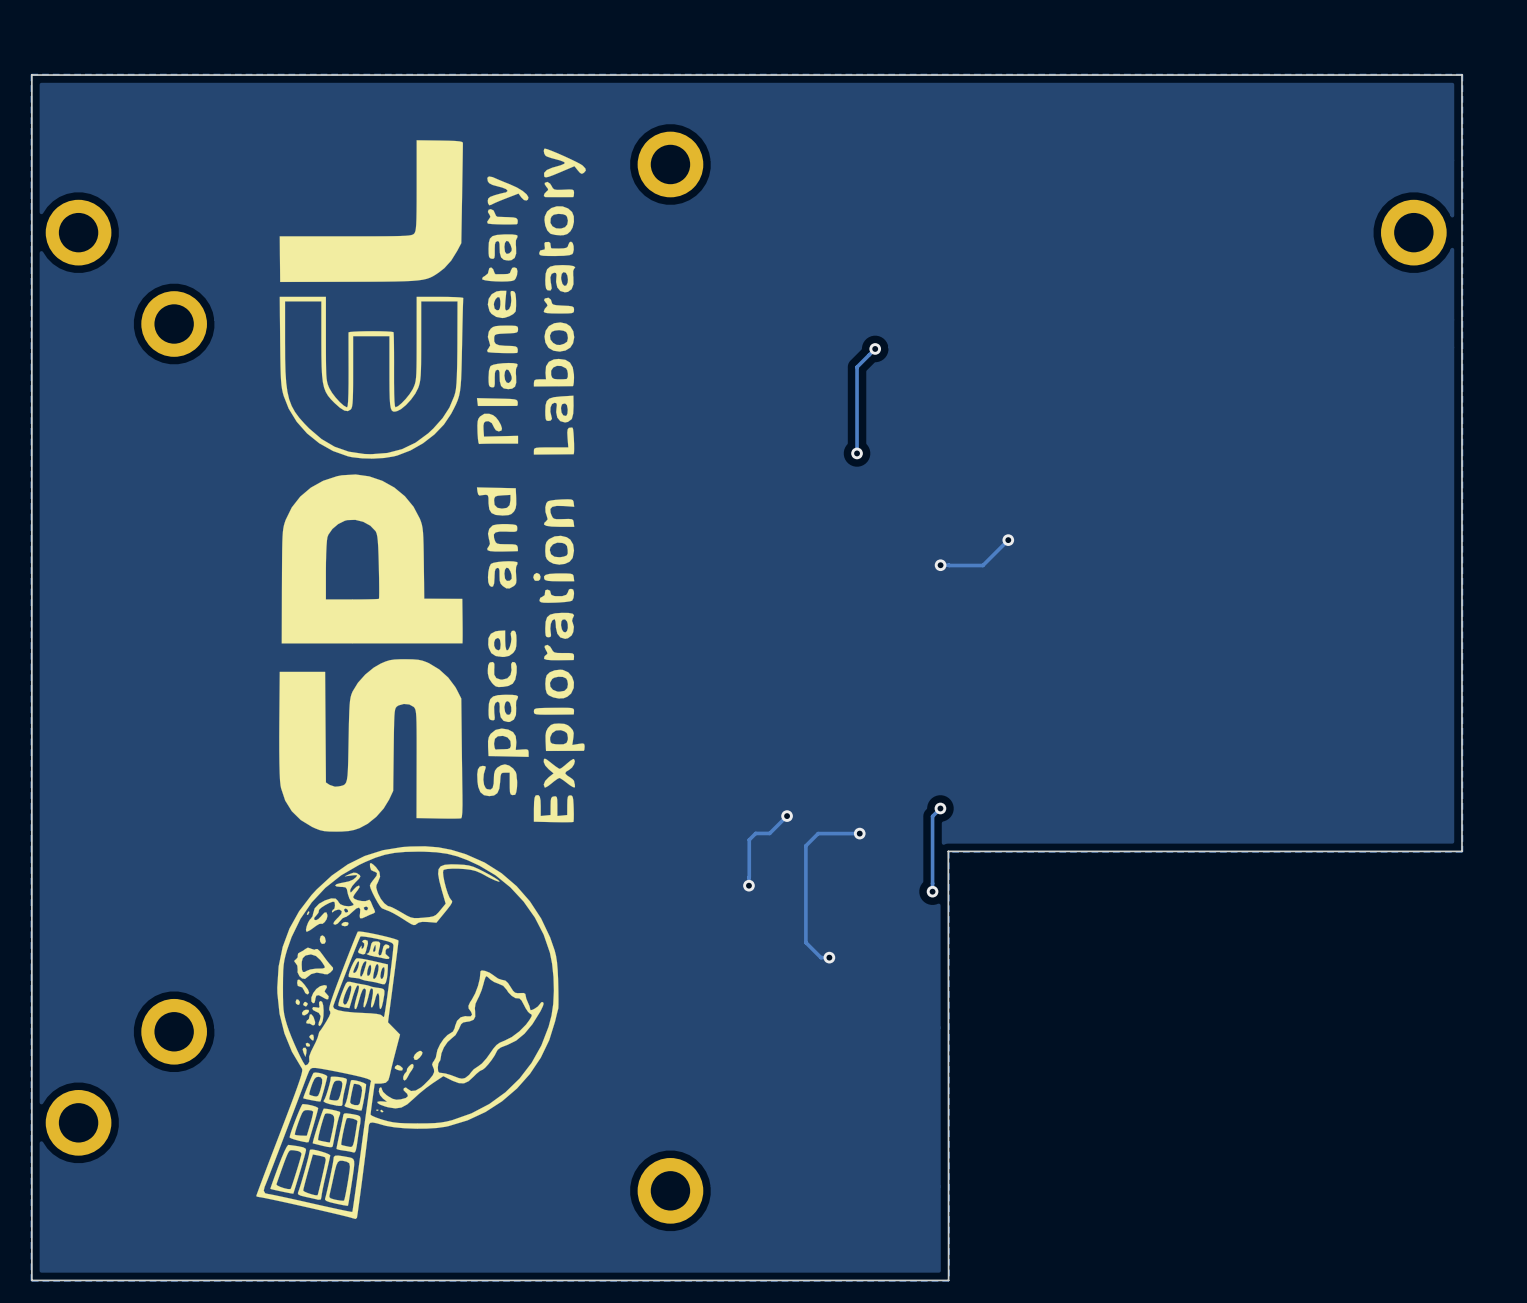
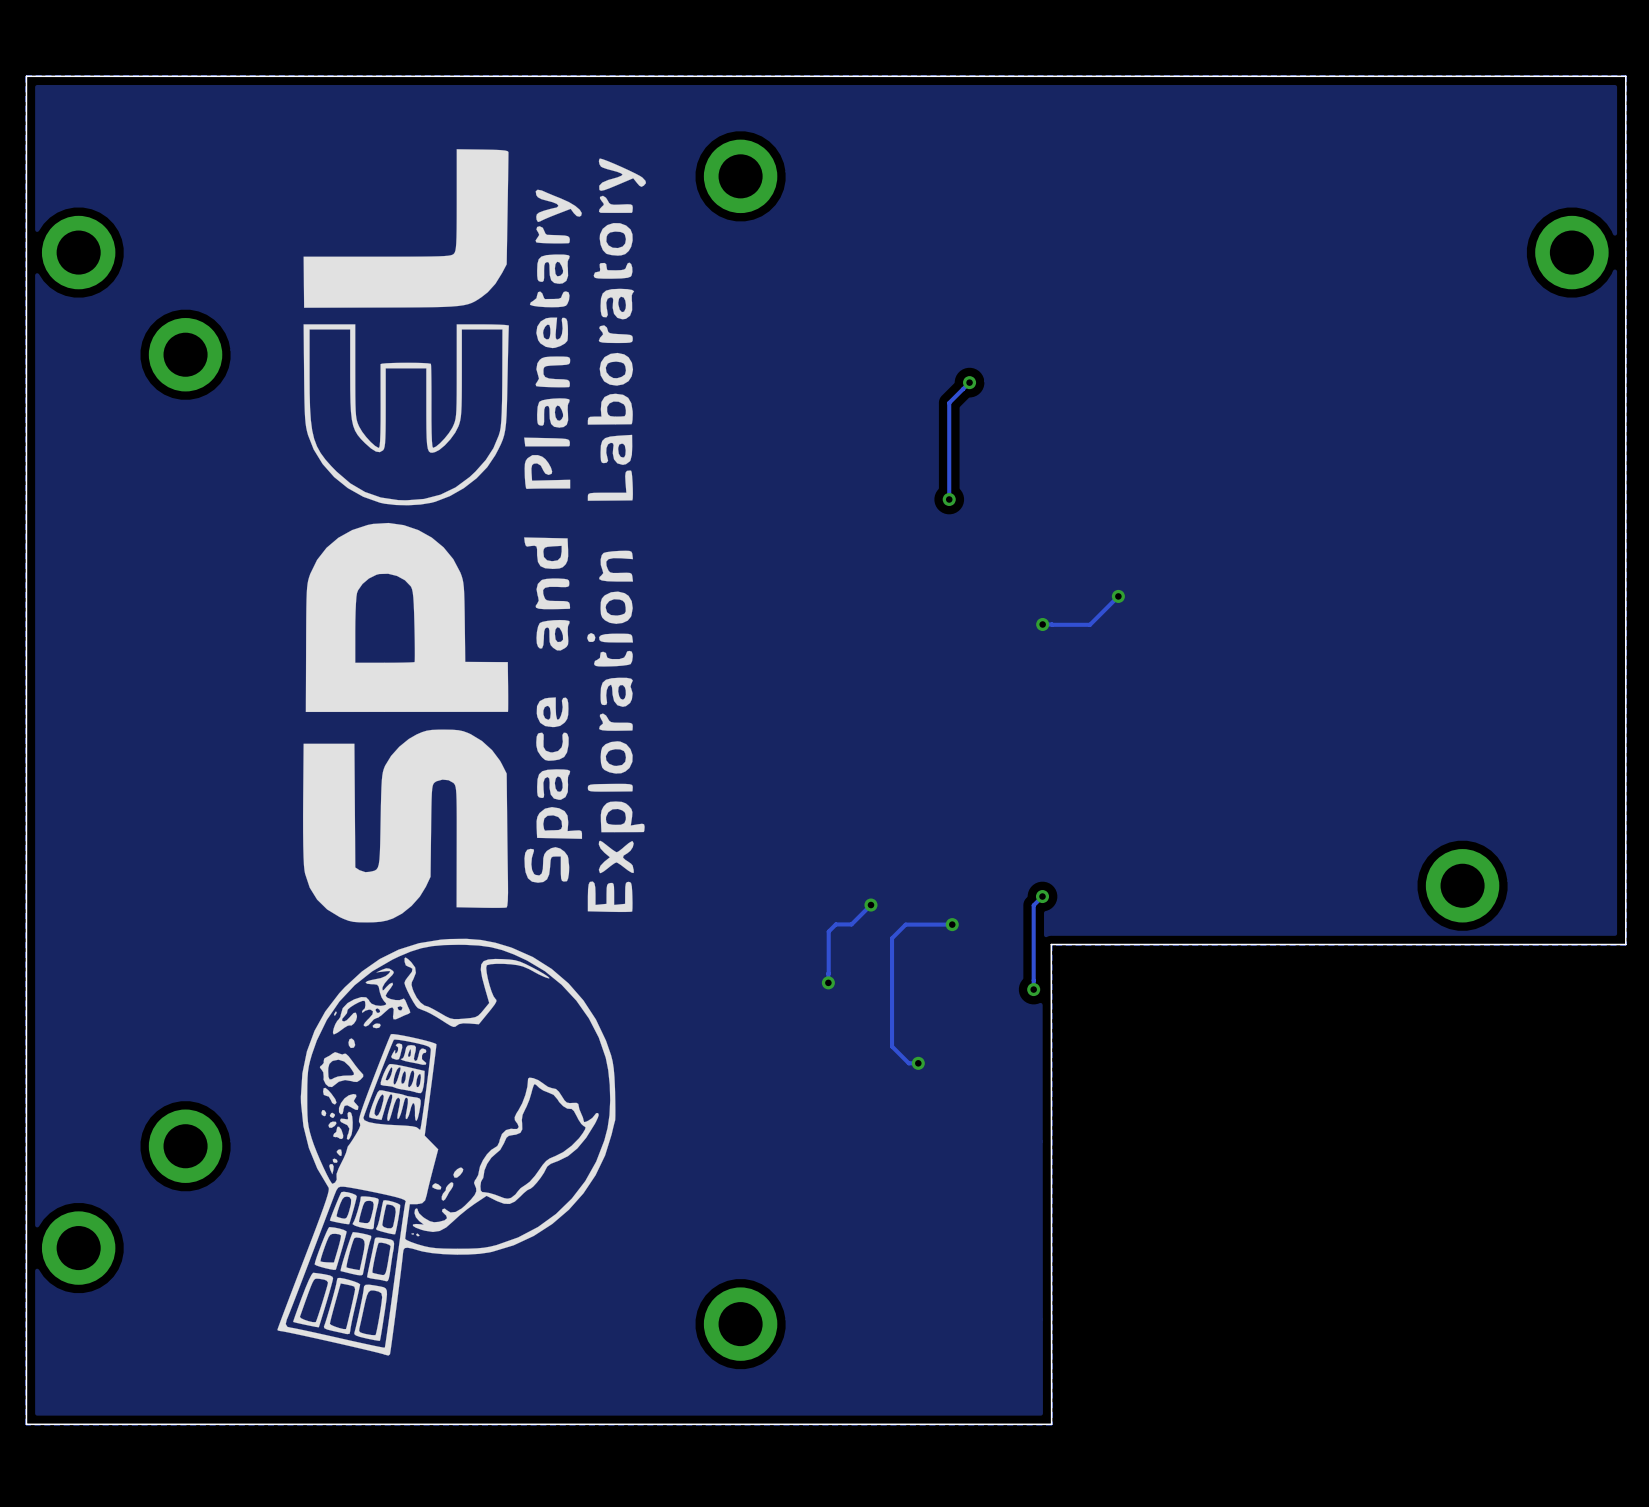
part: none -> (1462, 885)

